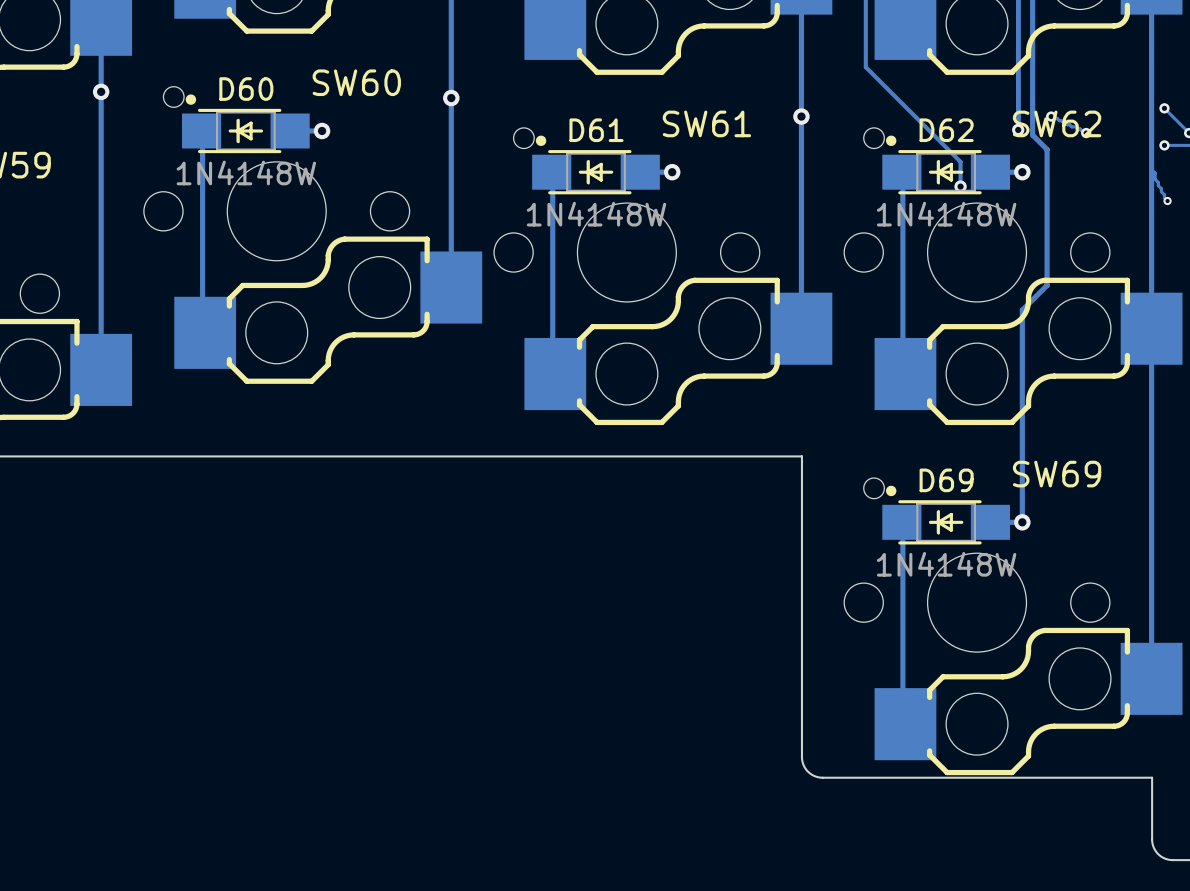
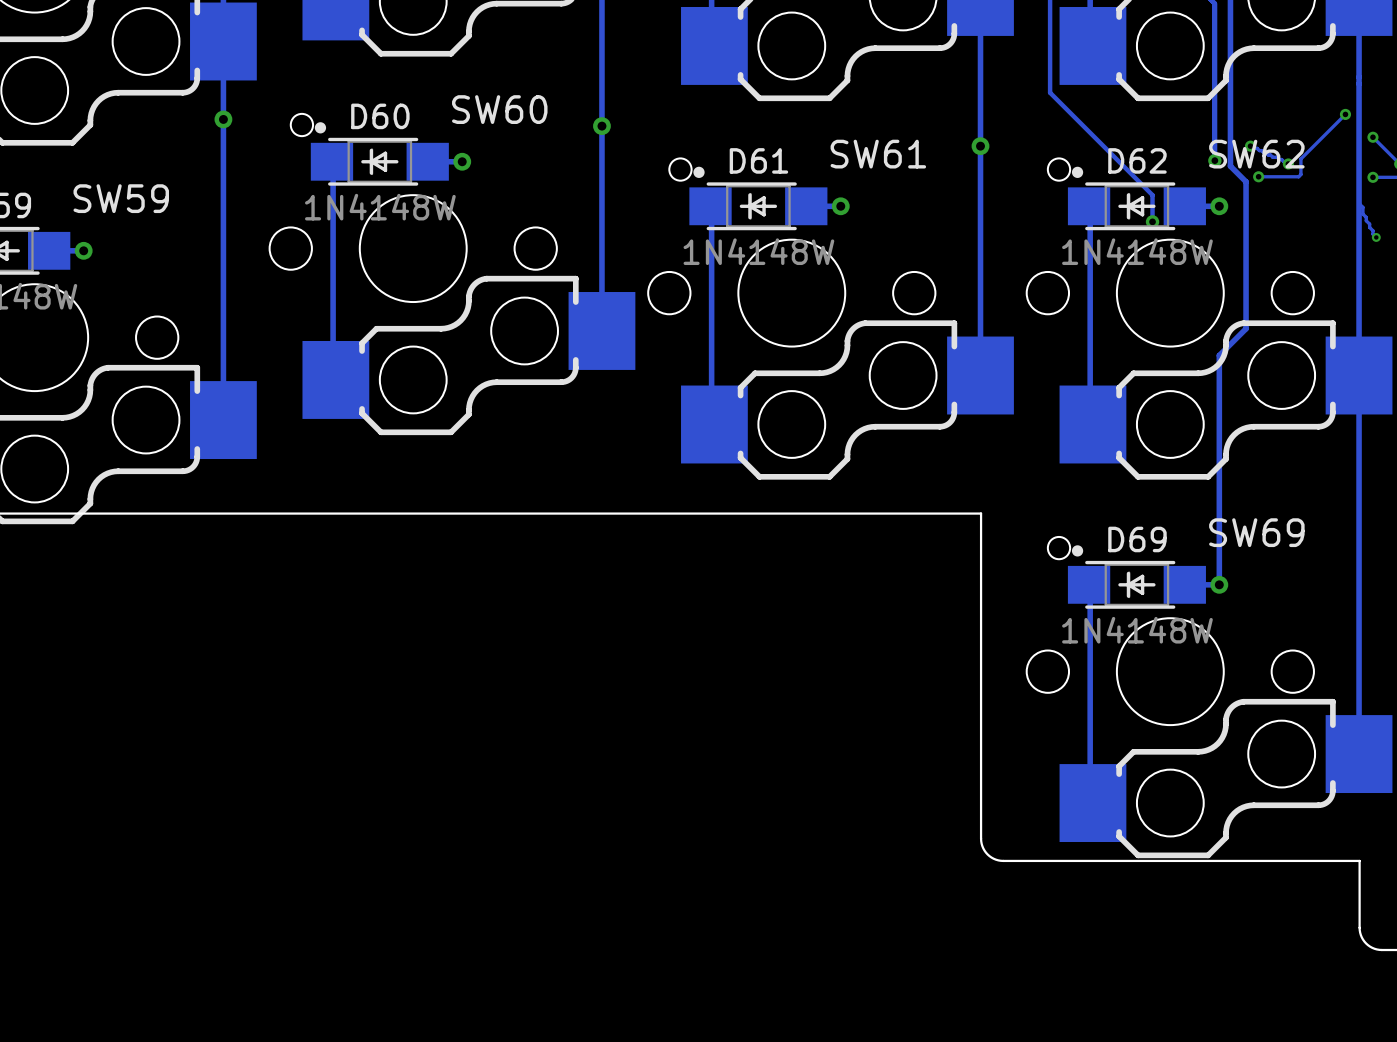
track: none -> (1345, 114) (1300, 158) (1300, 174) (1298, 176) (1258, 176)
via: none -> (1345, 114)
via: none -> (1258, 176)

